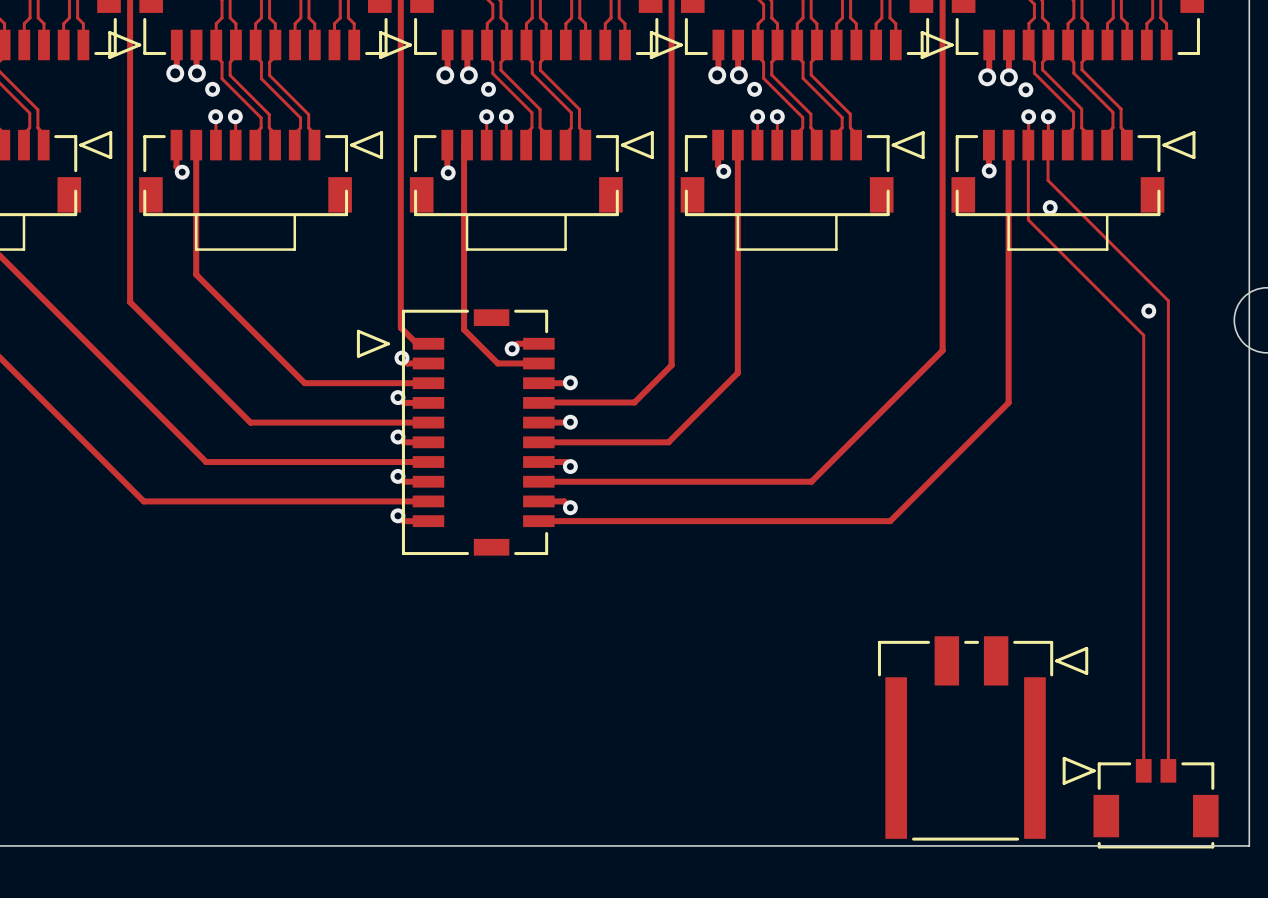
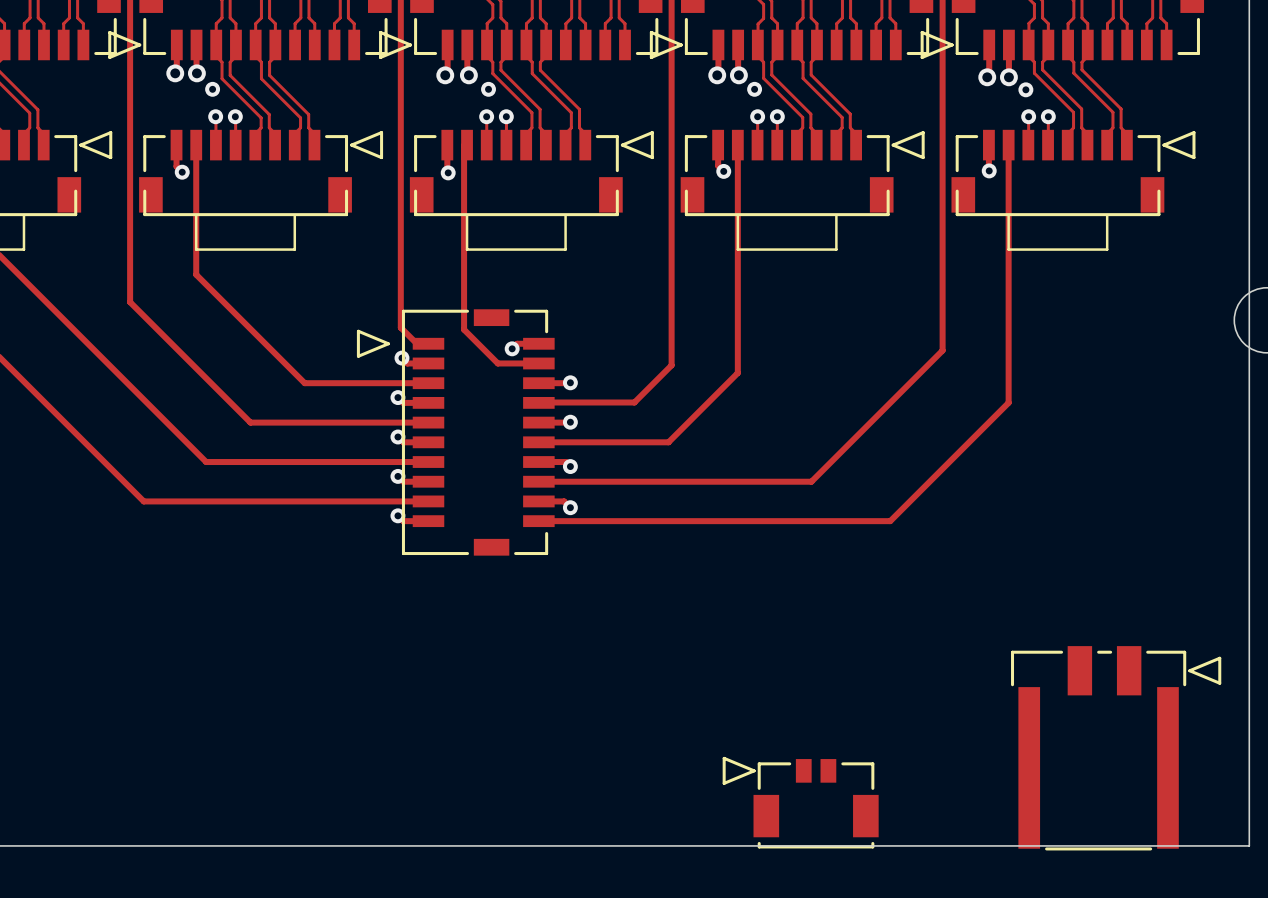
track: (1028, 145) (1028, 219) (1143, 335) (1143, 770) -> none
track: (1048, 145) (1048, 180) (1168, 300) (1168, 770) -> none
via: (1050, 207) -> none
via: (1148, 311) -> none
part position: (983, 738) -> (1116, 748)
part position: (1140, 802) -> (800, 802)

